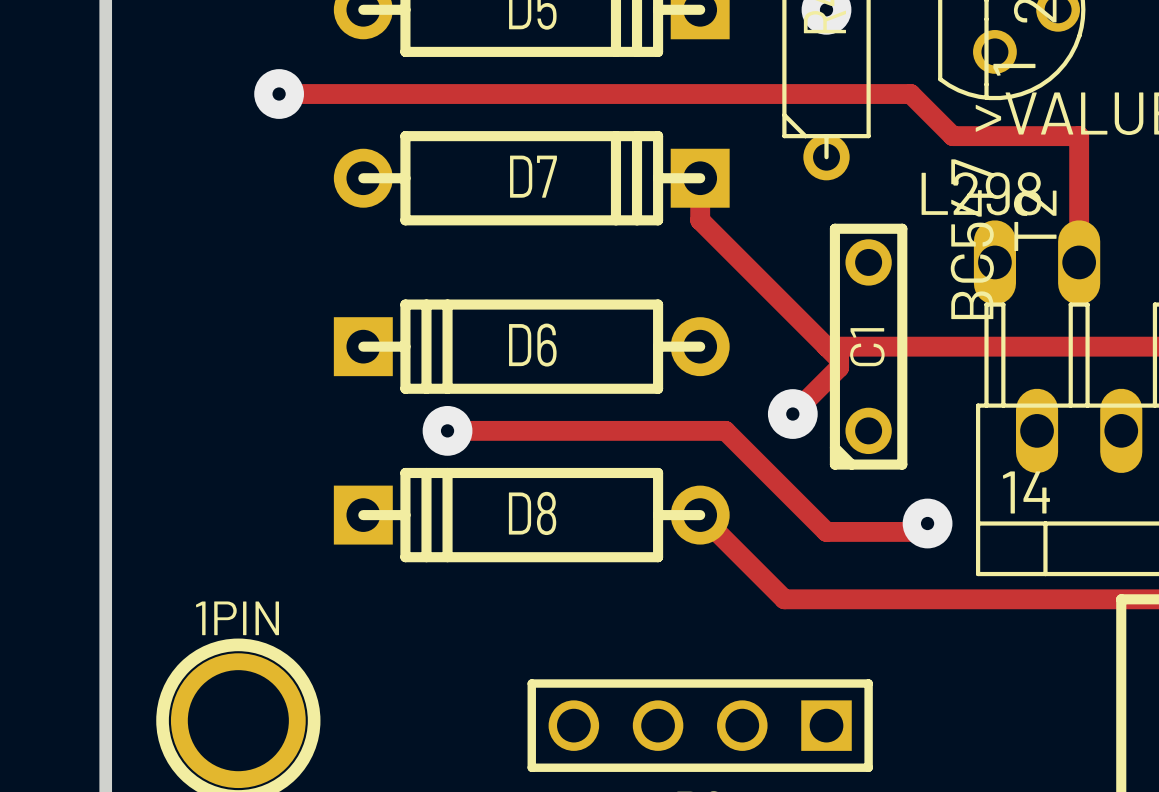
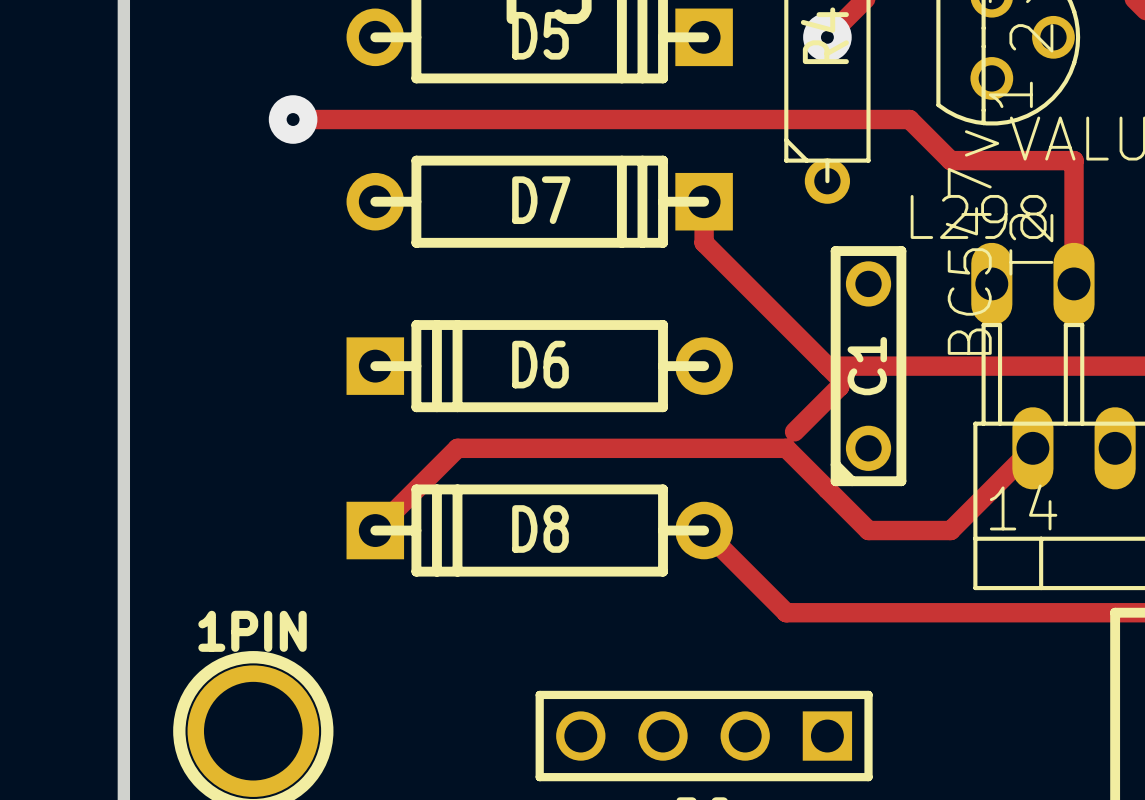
via: (792, 414) -> none
track: none -> (457, 448) (375, 530)
via: (447, 430) -> none
track: (725, 430) (826, 531) (919, 531) (927, 523) -> (728, 448) (786, 448) (868, 530) (950, 530) (1032, 448)
via: (927, 523) -> none

